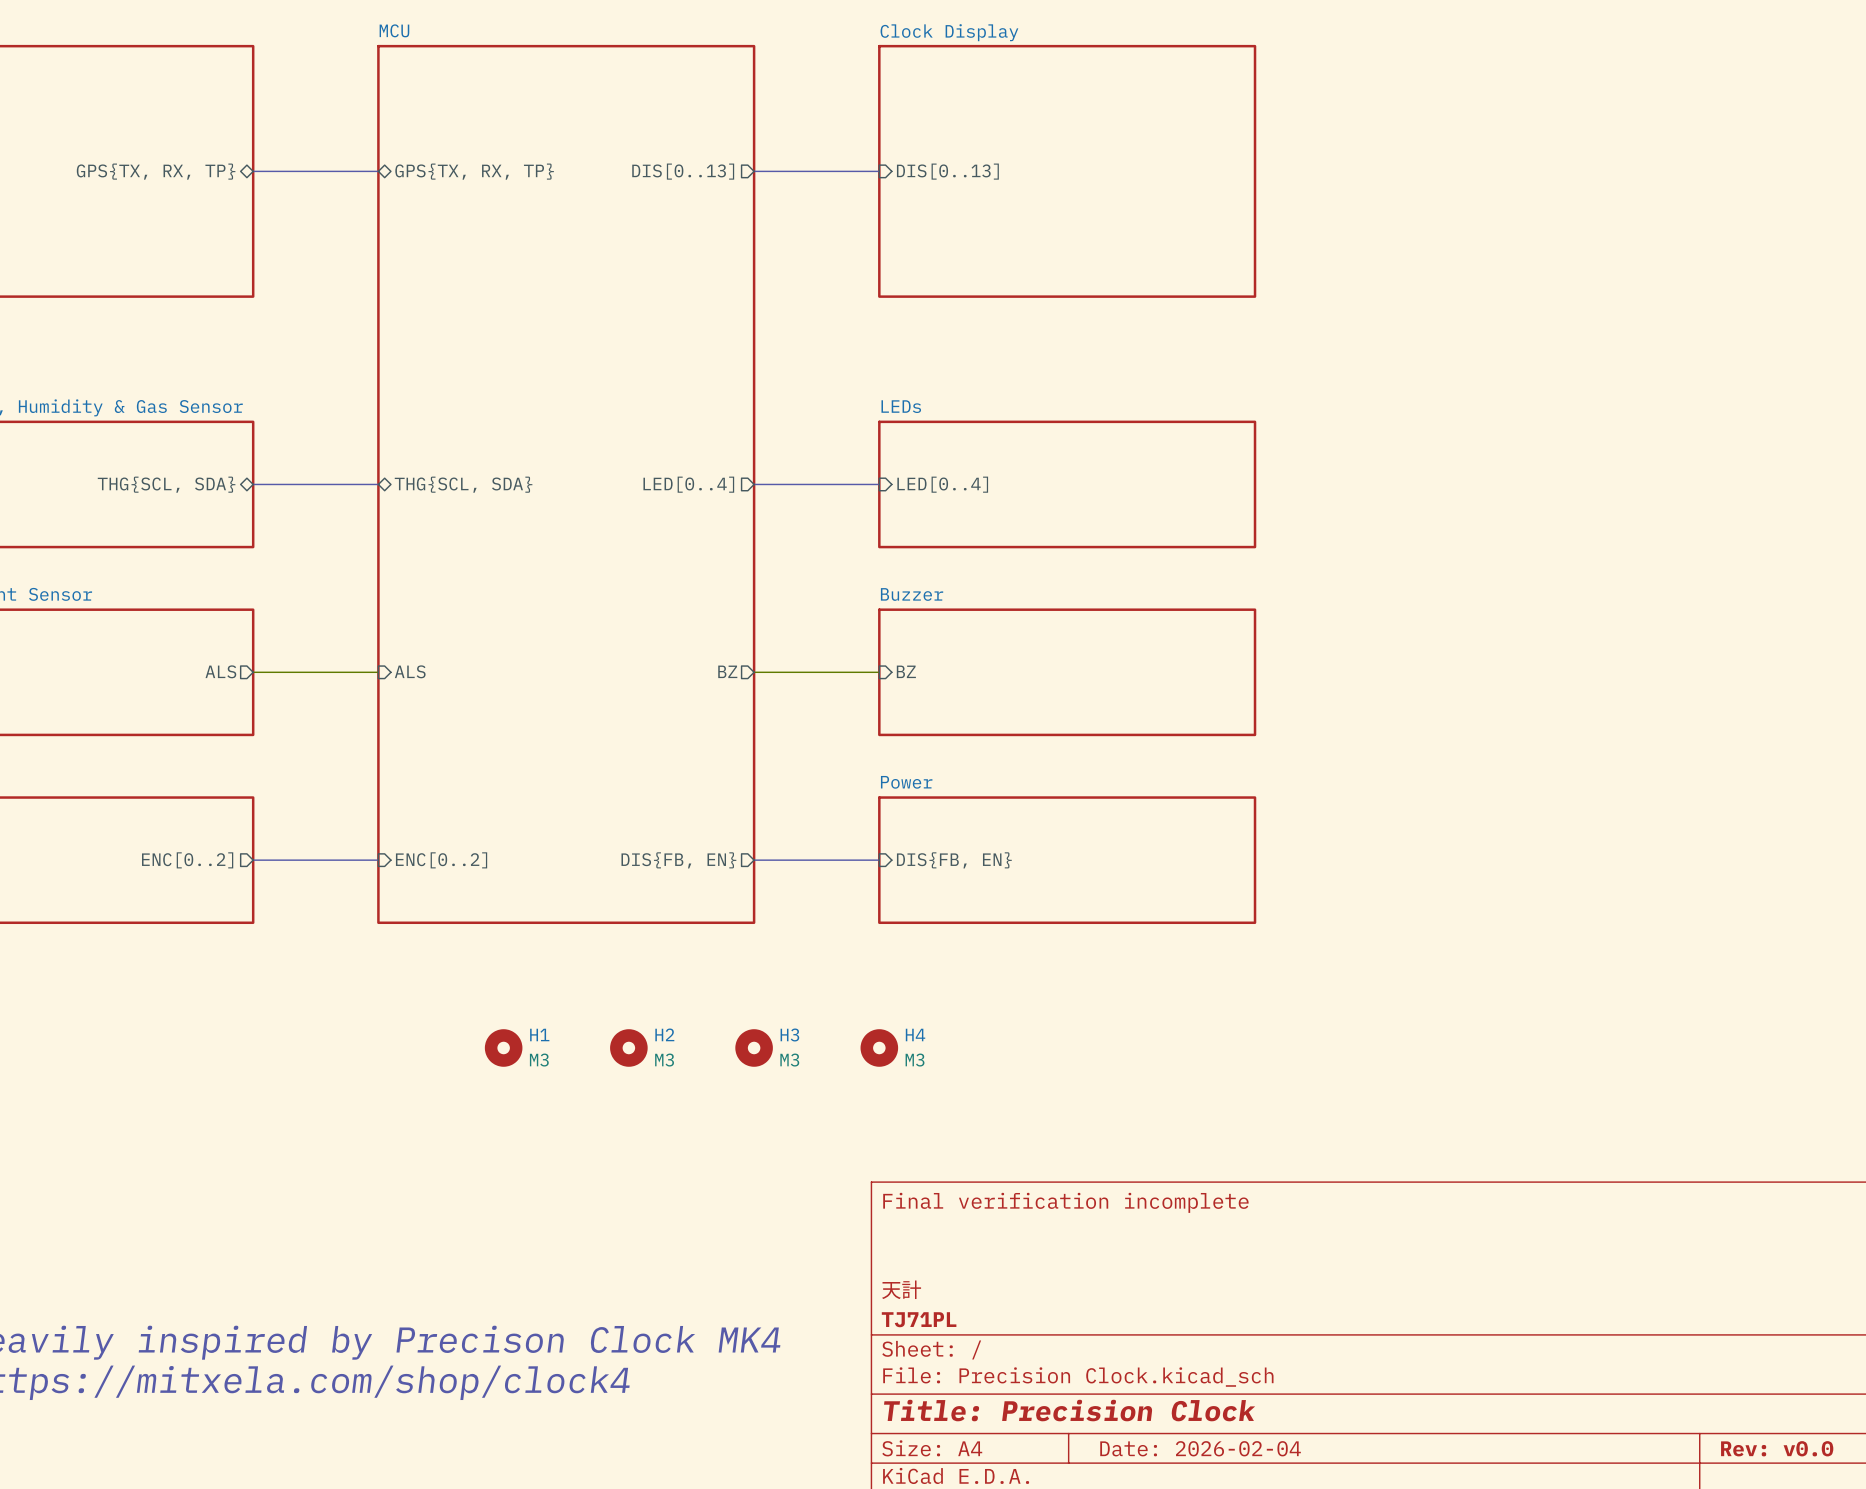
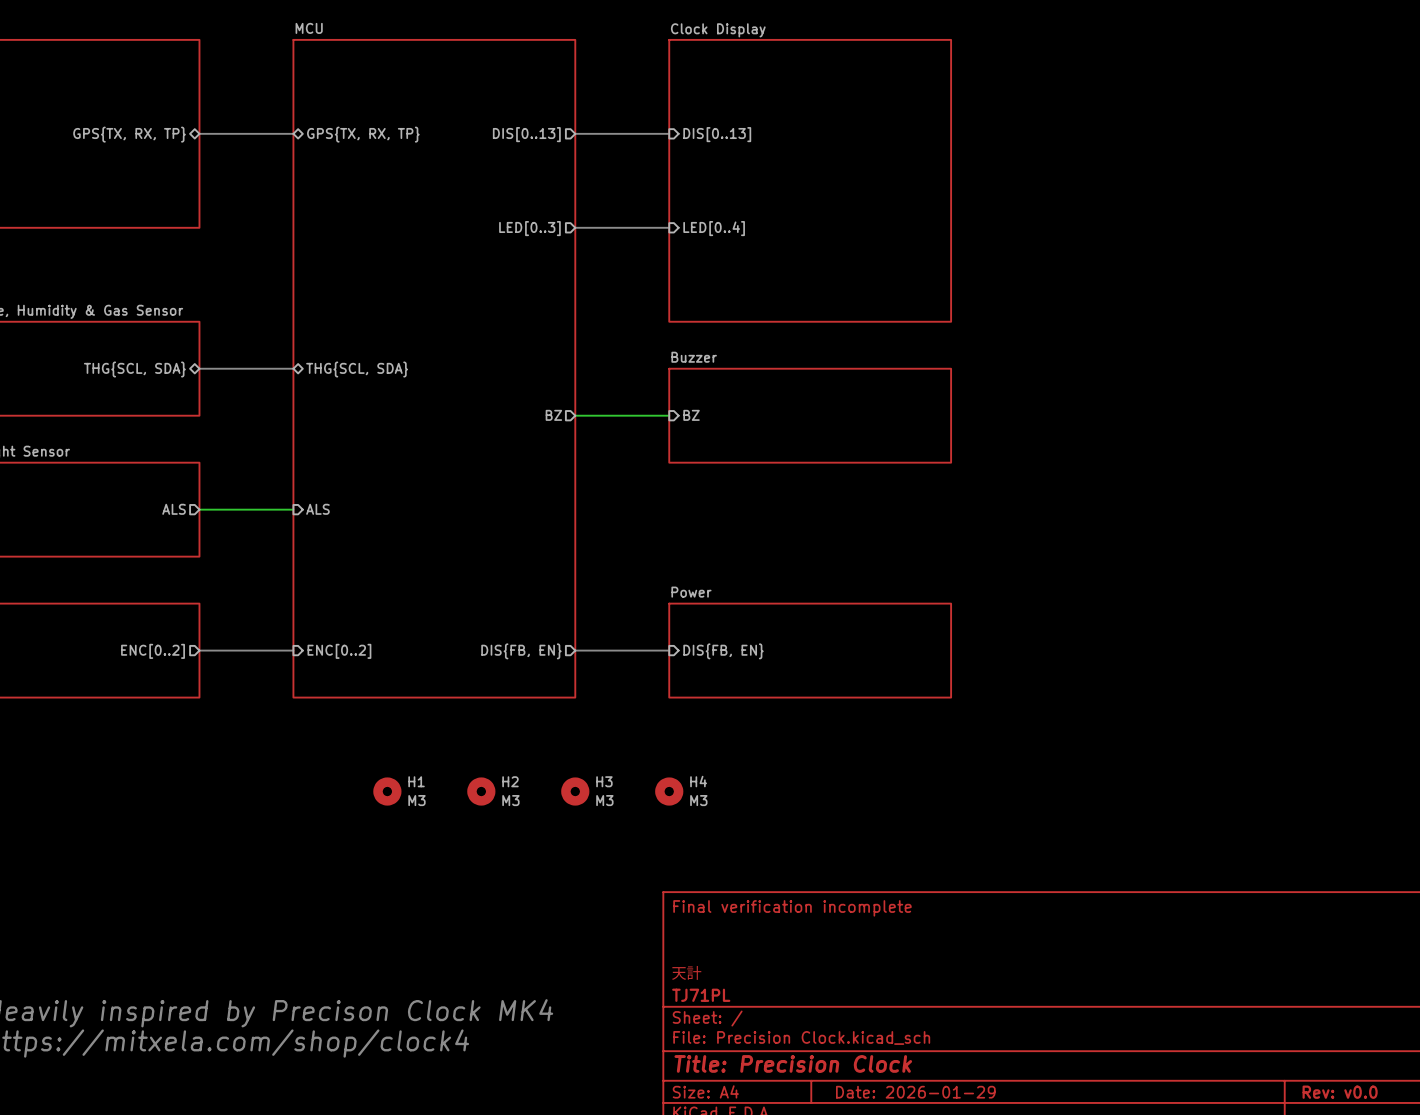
sheet Clock Display: (1067, 171) -> none
sheet Clock Display: none -> (810, 180)
sheet pin: none -> LED[0..3] (529, 228)
sheet pin: none -> LED[0..4] (714, 228)
sheet pin: LED[0..4] (688, 484) -> none
bus: (754, 484) (879, 484) -> (575, 227) (669, 227)
sheet pin: LED[0..4] (942, 484) -> none
sheet LEDs: (1067, 484) -> none
sheet pin: none -> BZ (553, 415)
sheet pin: none -> BZ (691, 415)
sheet pin: BZ (727, 671) -> none
sheet pin: BZ (906, 671) -> none
wire: (754, 672) (879, 672) -> (575, 415) (669, 415)
sheet Buzzer position: (1067, 672) -> (810, 415)
title block: Date: 2026-02-04 (1200, 1448) -> Date: 2026-01-29 (915, 1092)

